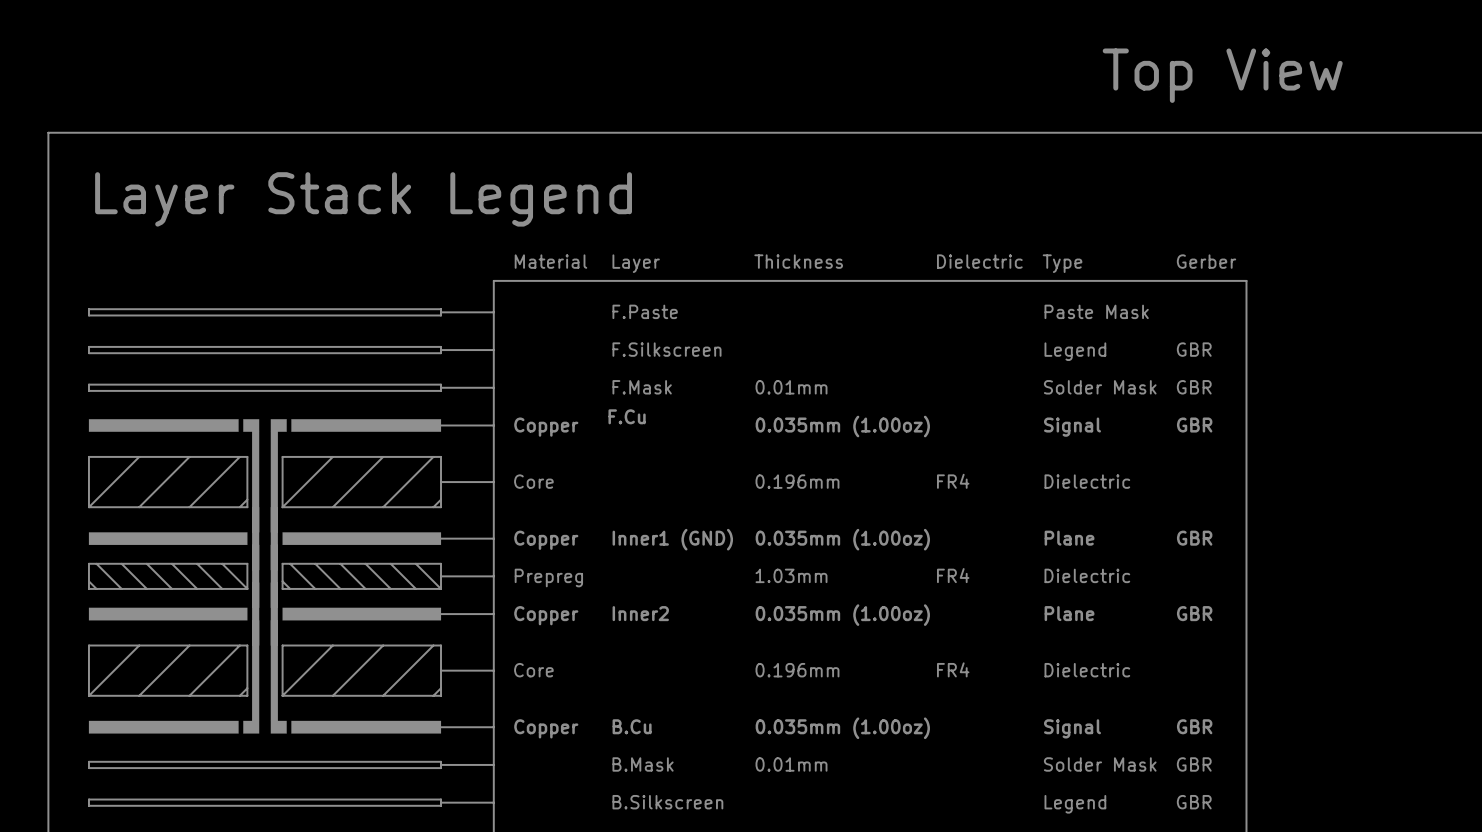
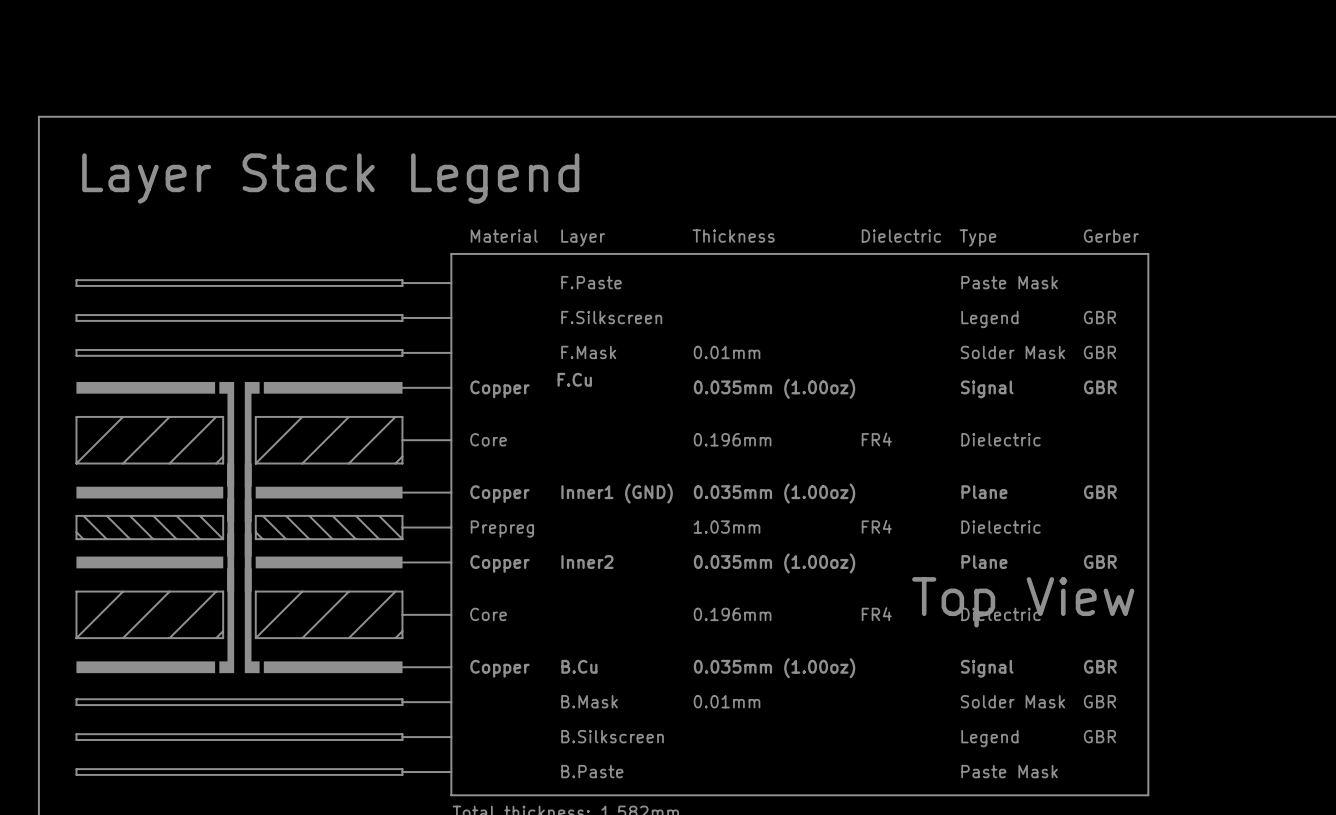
text: Top View (1222, 75) -> none
text: none -> Top View (1023, 602)

